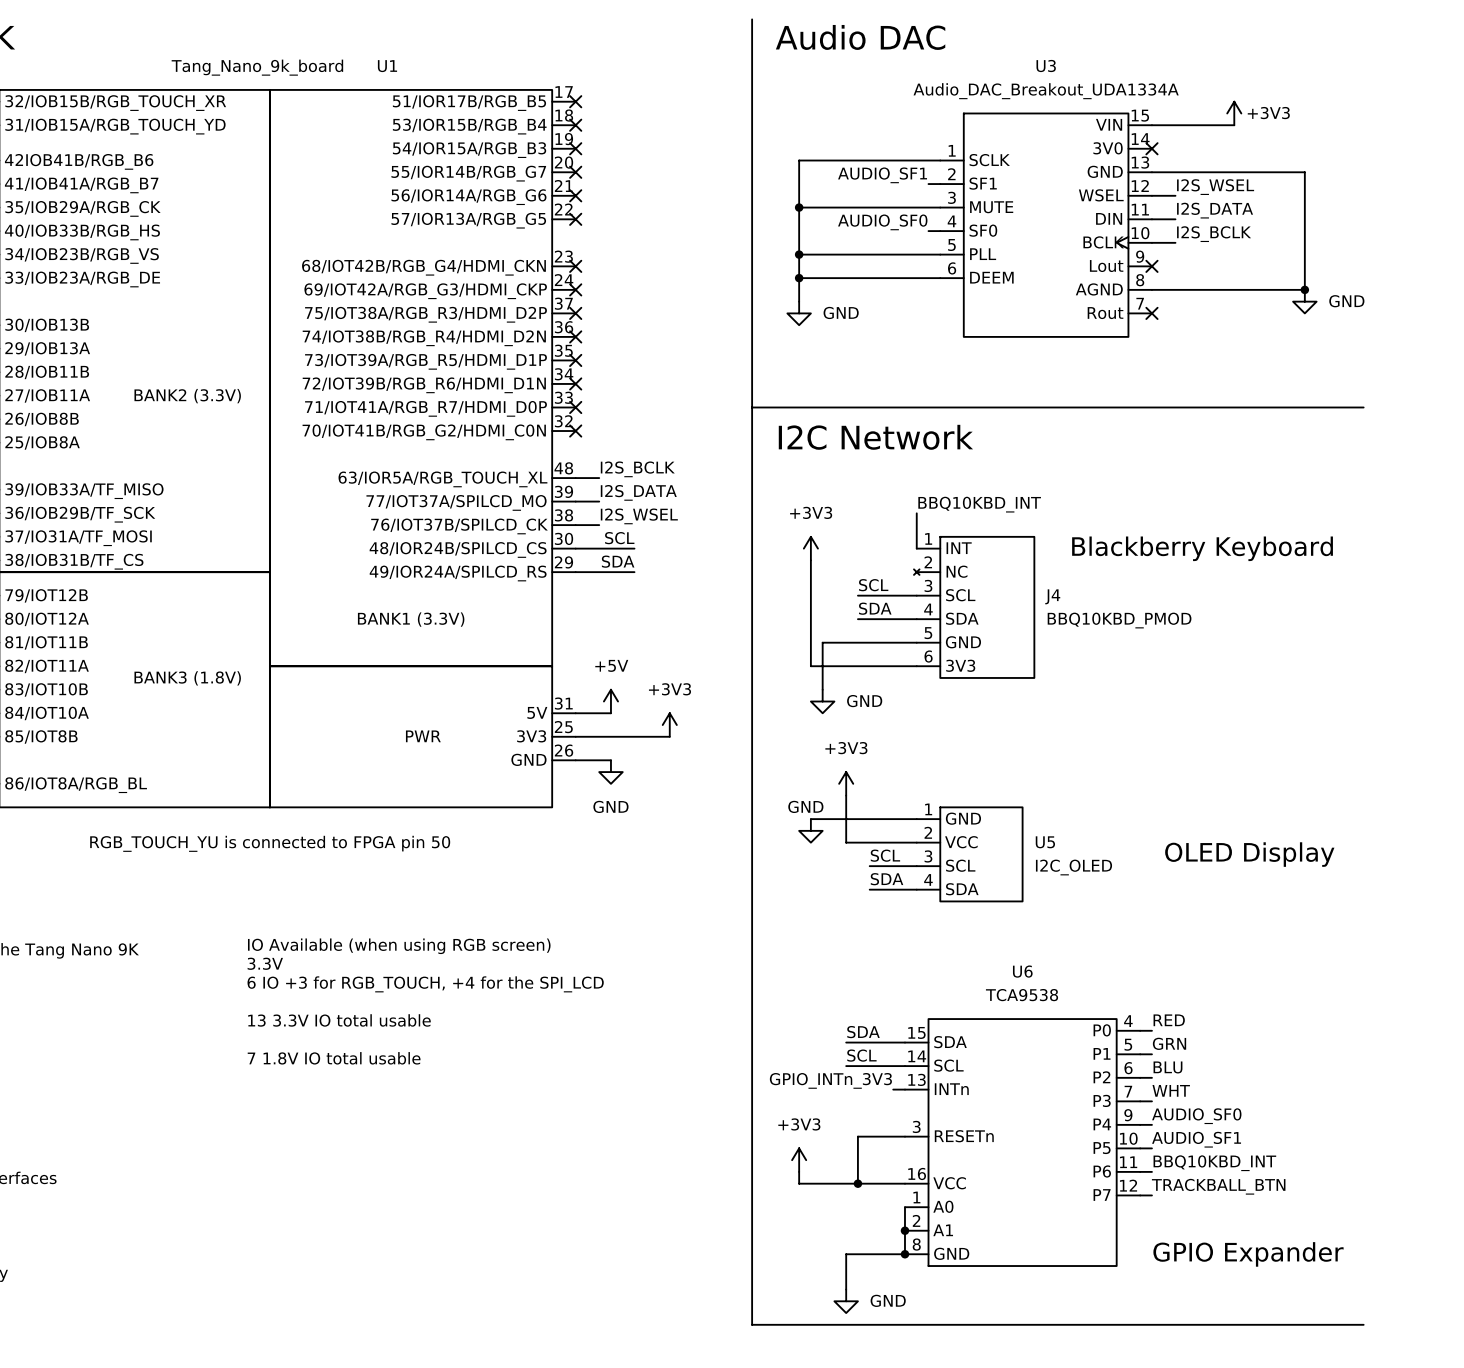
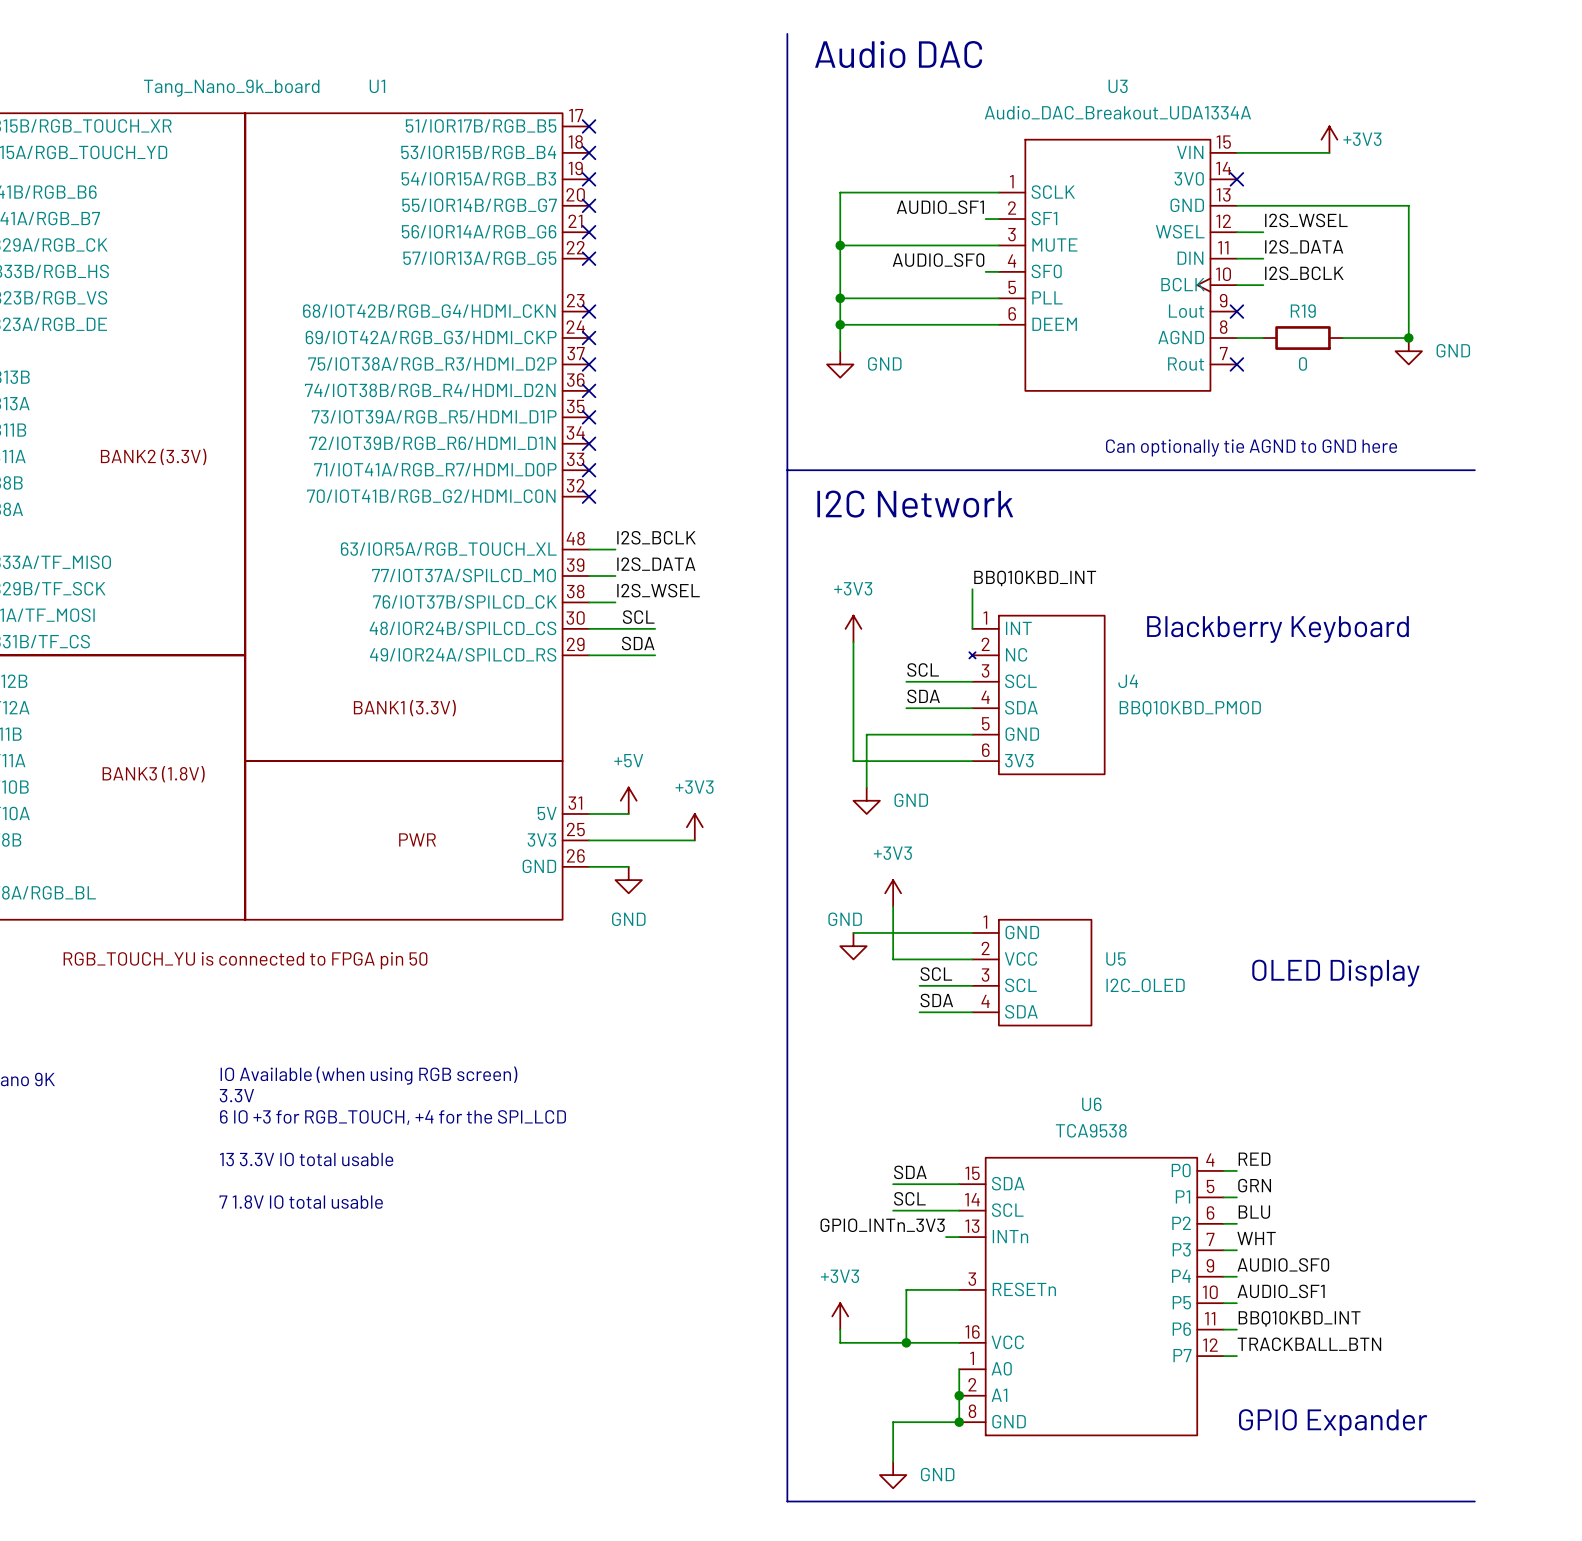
wire: (1175, 289) (1246, 289) -> none
R19: none -> 0 (1303, 338)
text: none -> Can optionally tie AGND to GND here (1251, 447)

